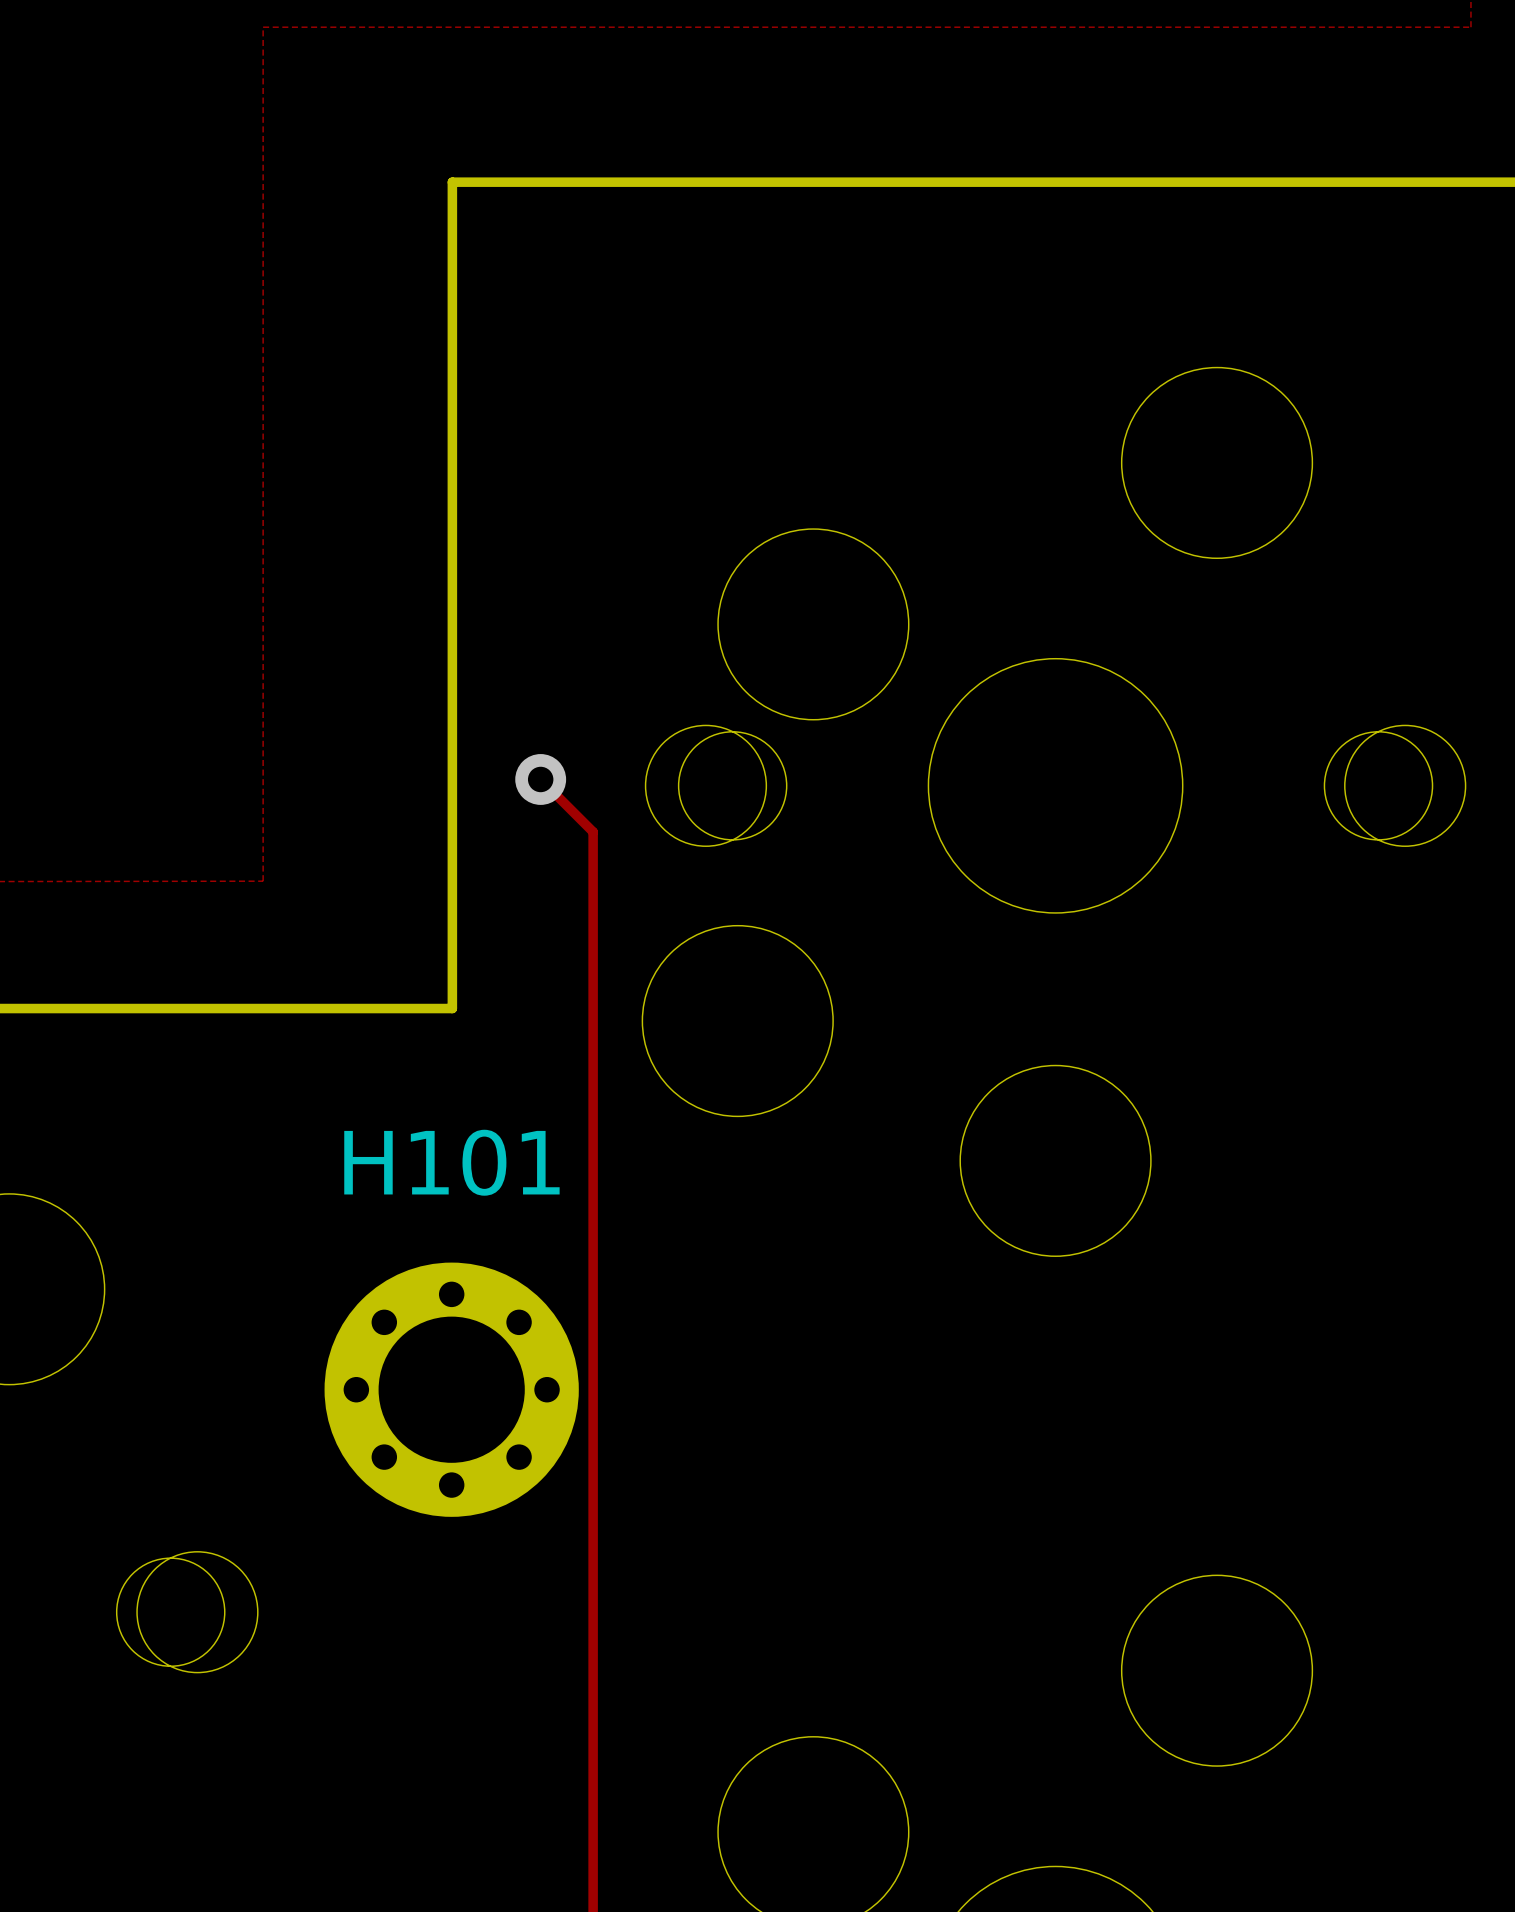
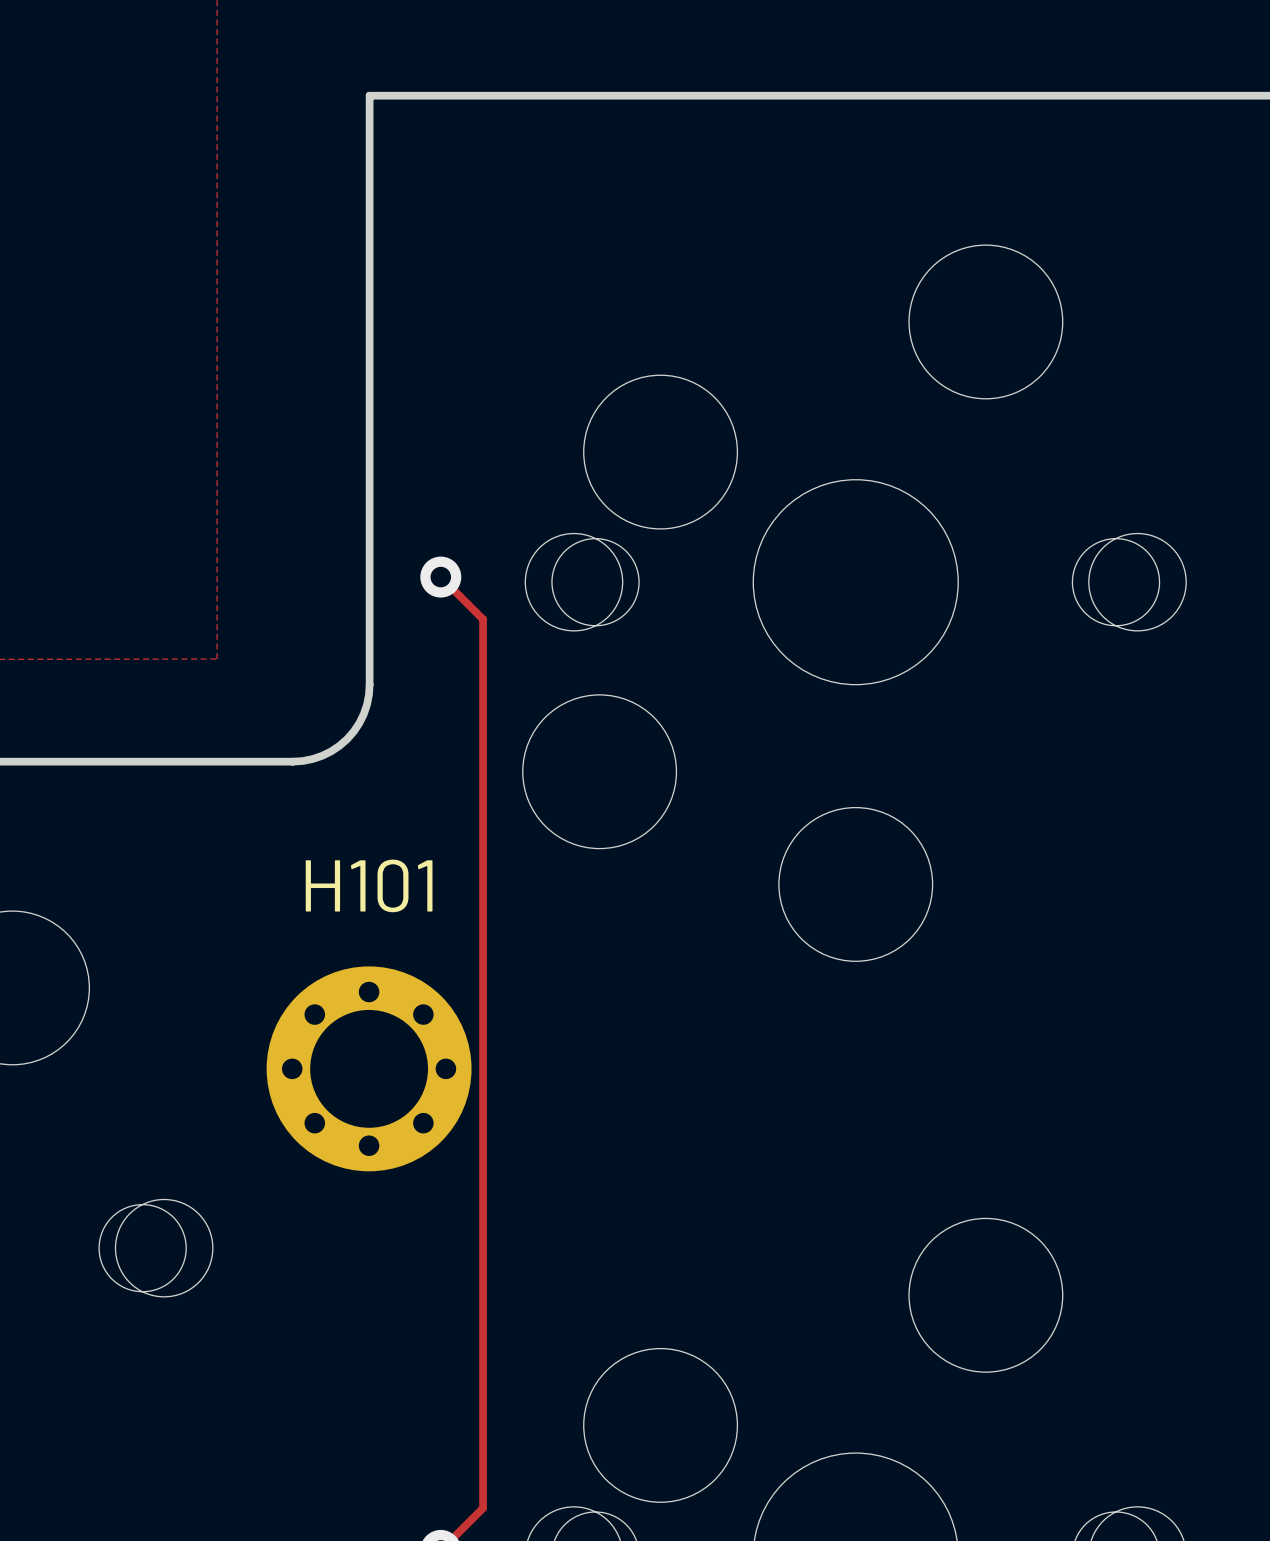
board edge: (452, 913) (452, 1008) (357, 1008) -> (369, 684) (363, 714) (347, 739) (322, 755) (292, 761)

